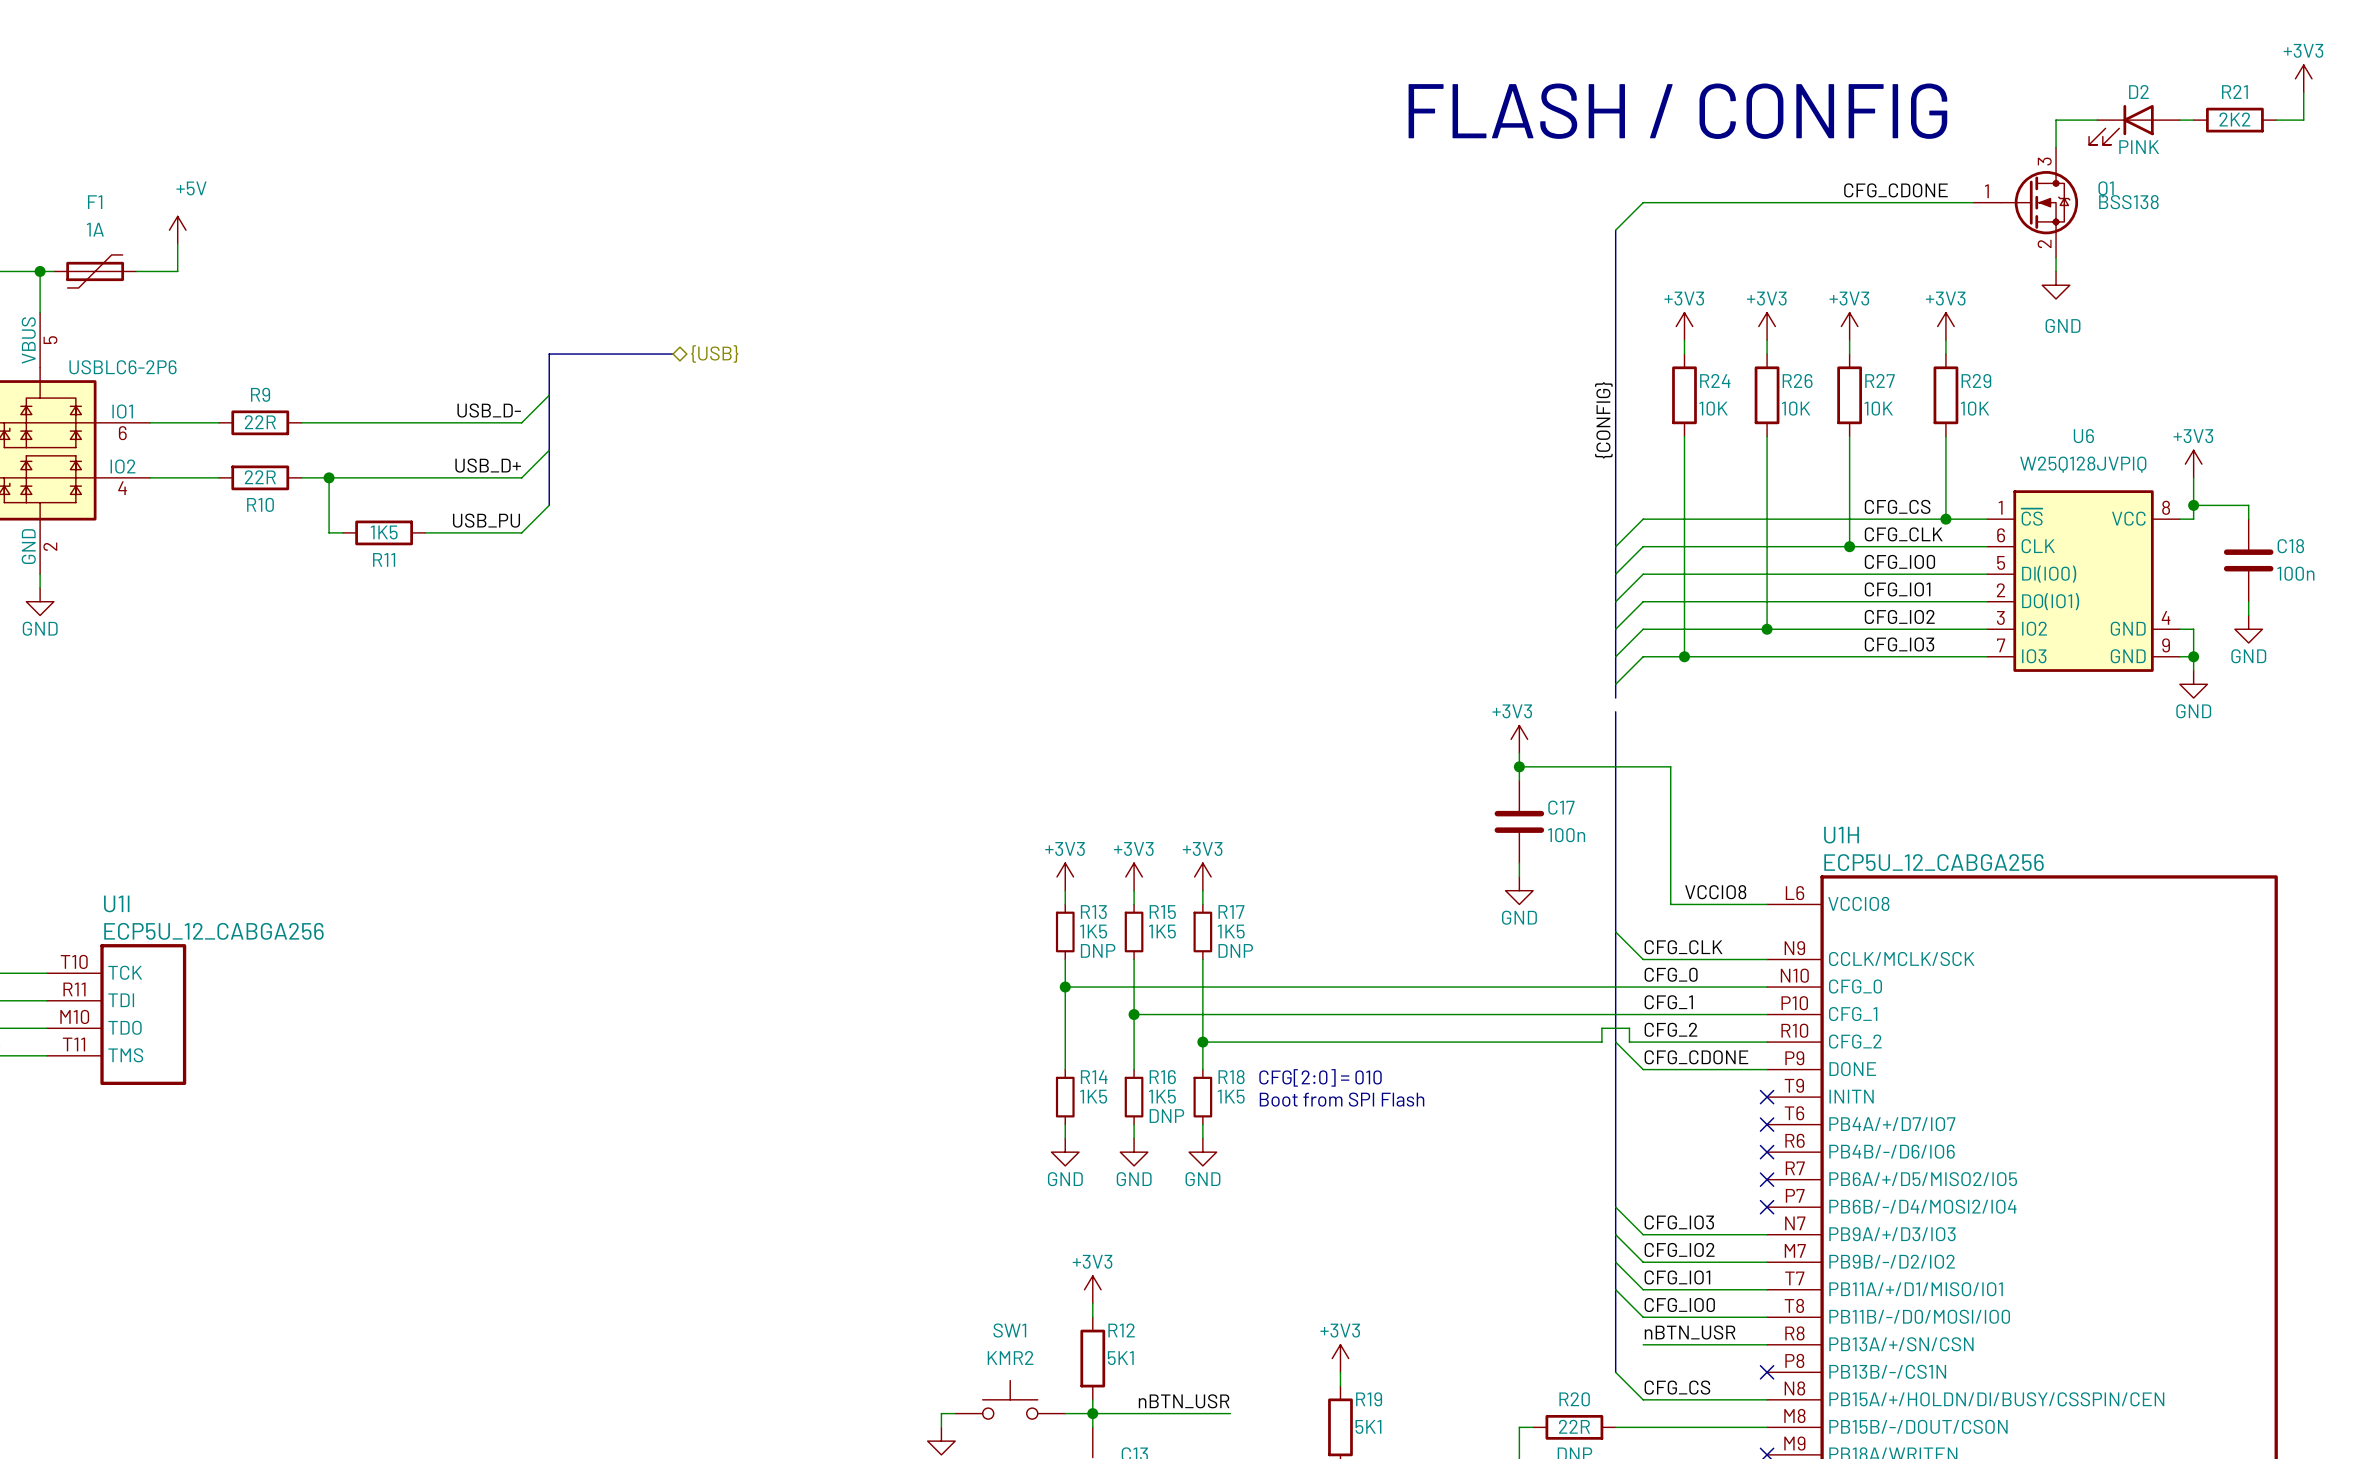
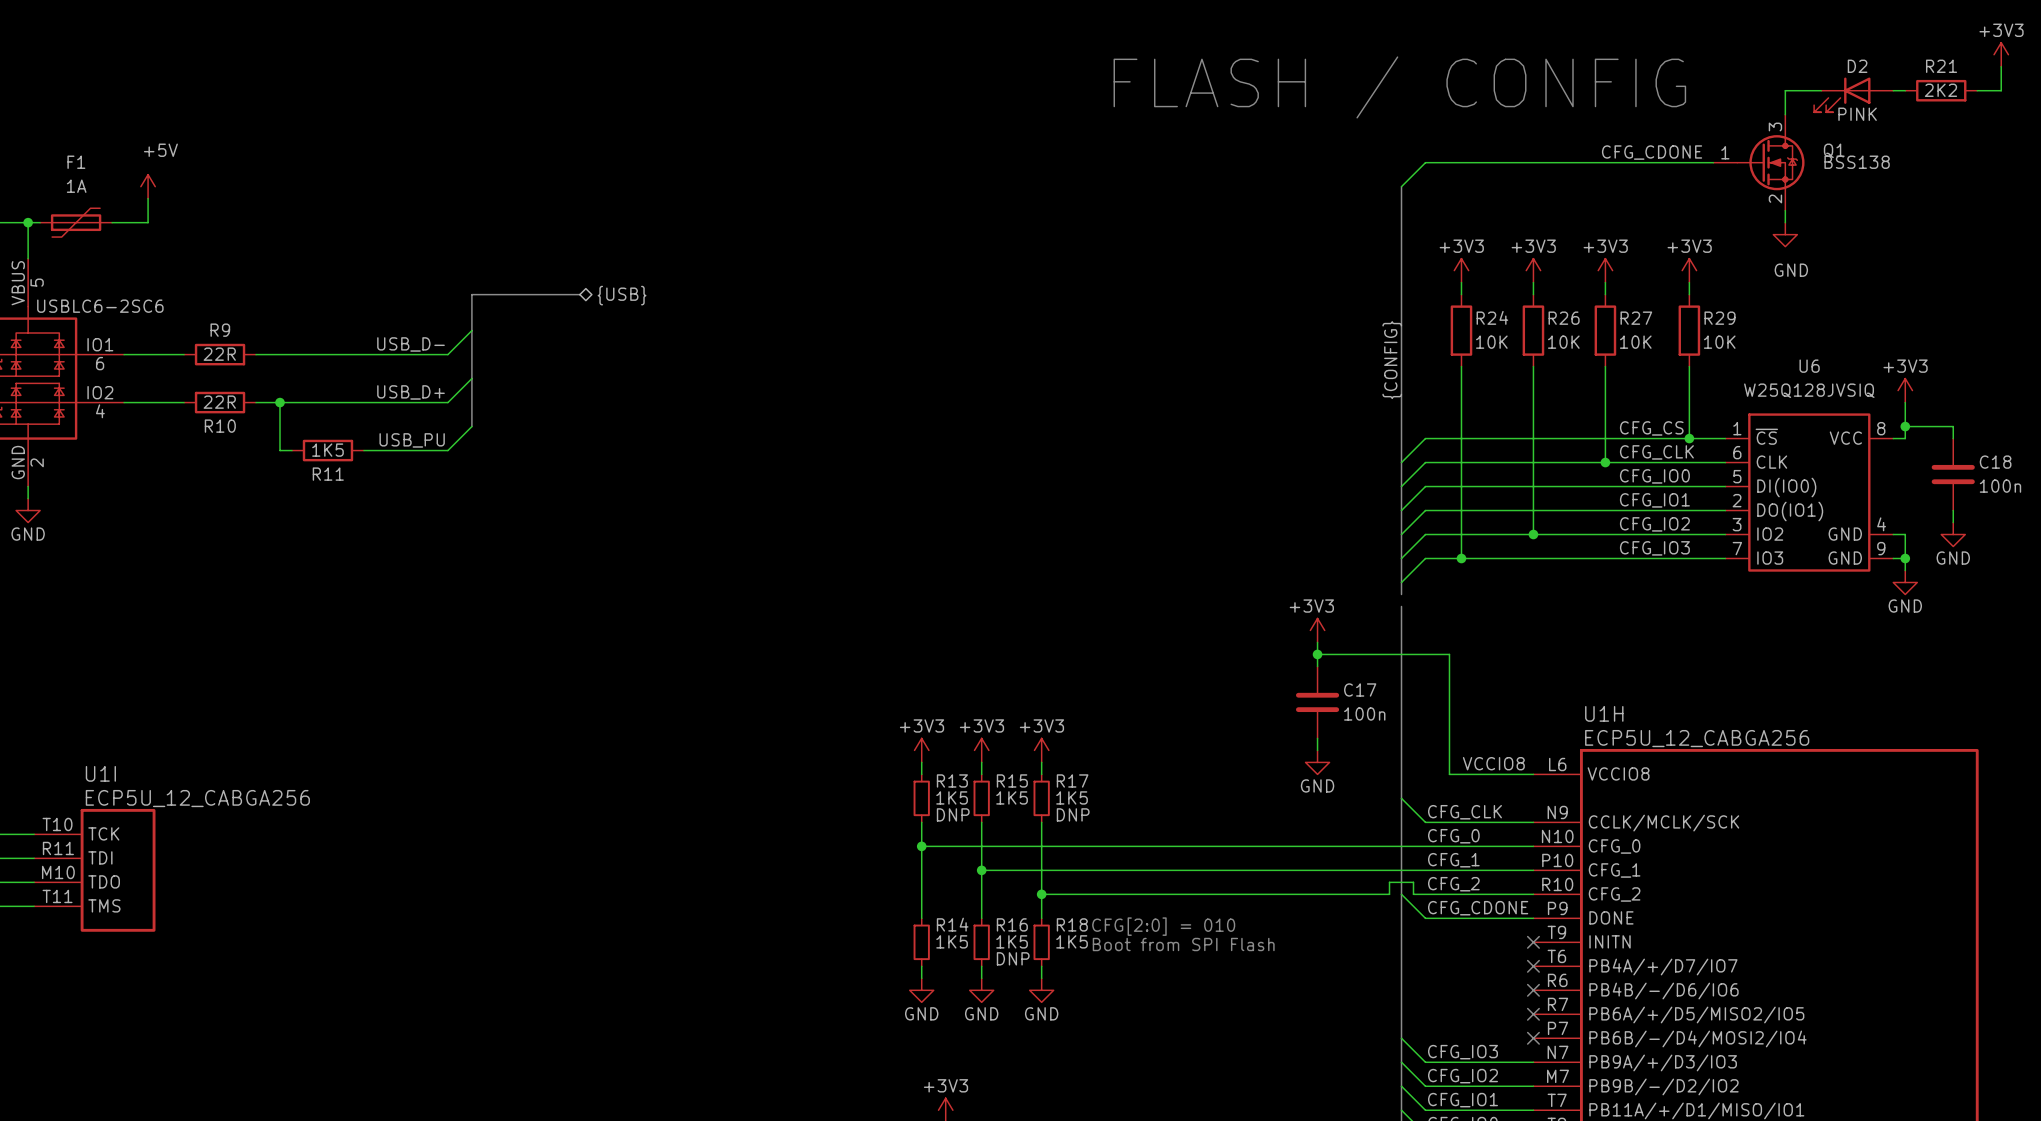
part value: USBLC6-2P6 (123, 367) -> USBLC6-2SC6 (100, 306)
U6 value: W25Q128JVPIQ (2083, 464) -> W25Q128JVSIQ (1809, 390)

